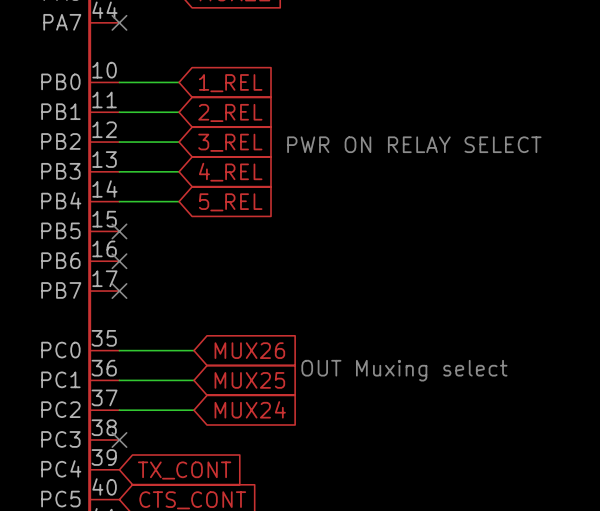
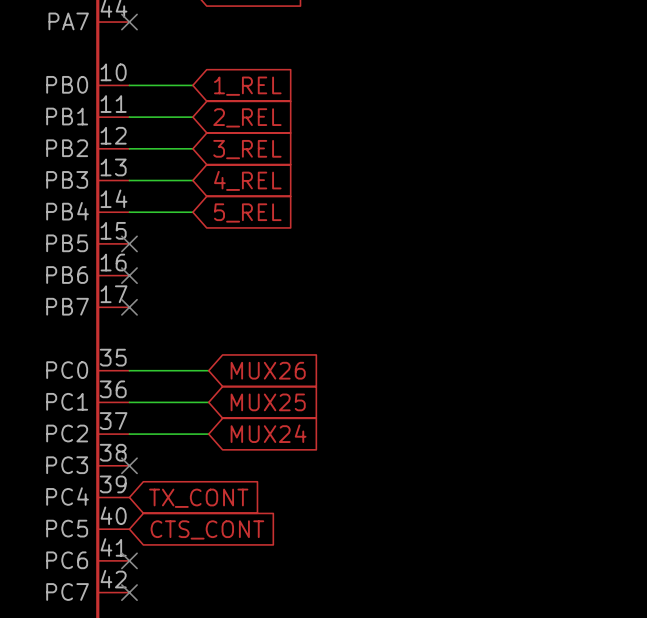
text: PWR ON RELAY SELECT (414, 144) -> none
text: OUT Muxing select (404, 370) -> none

